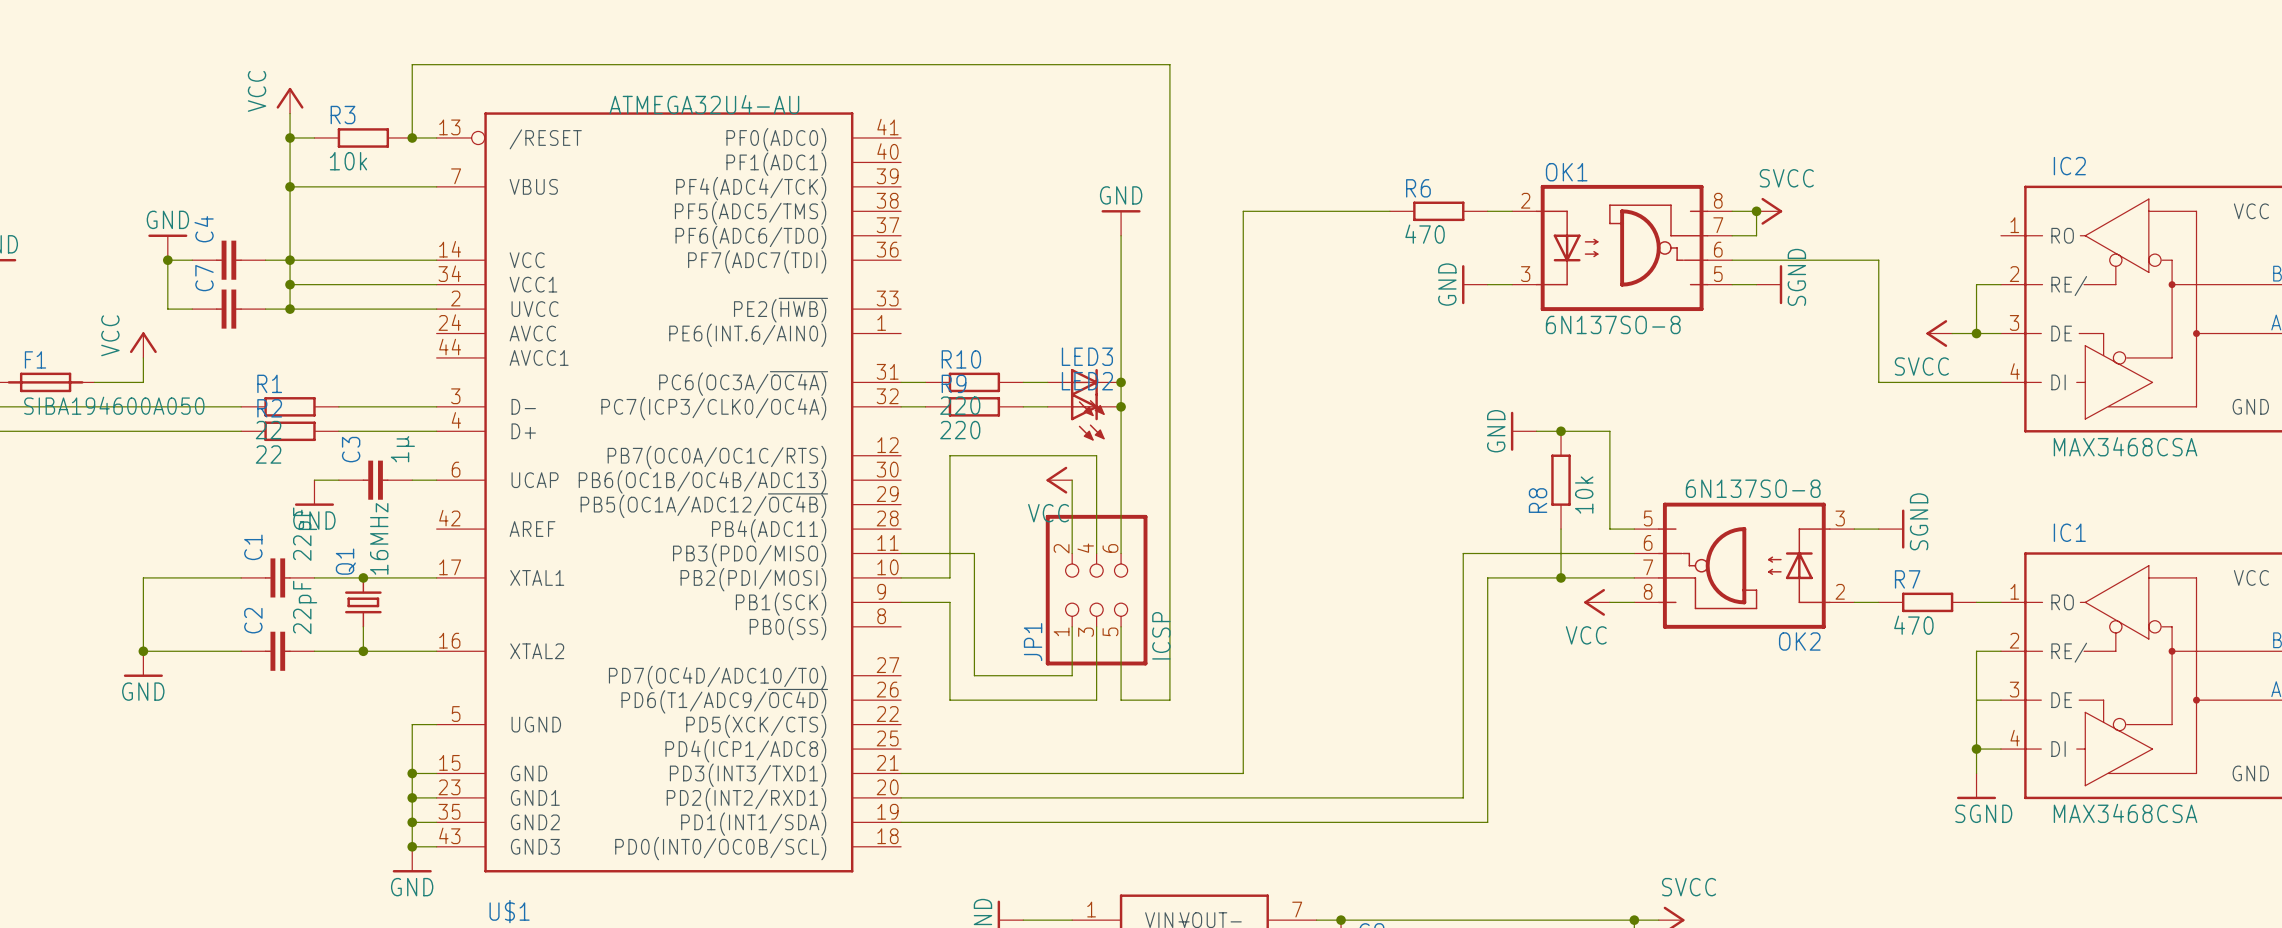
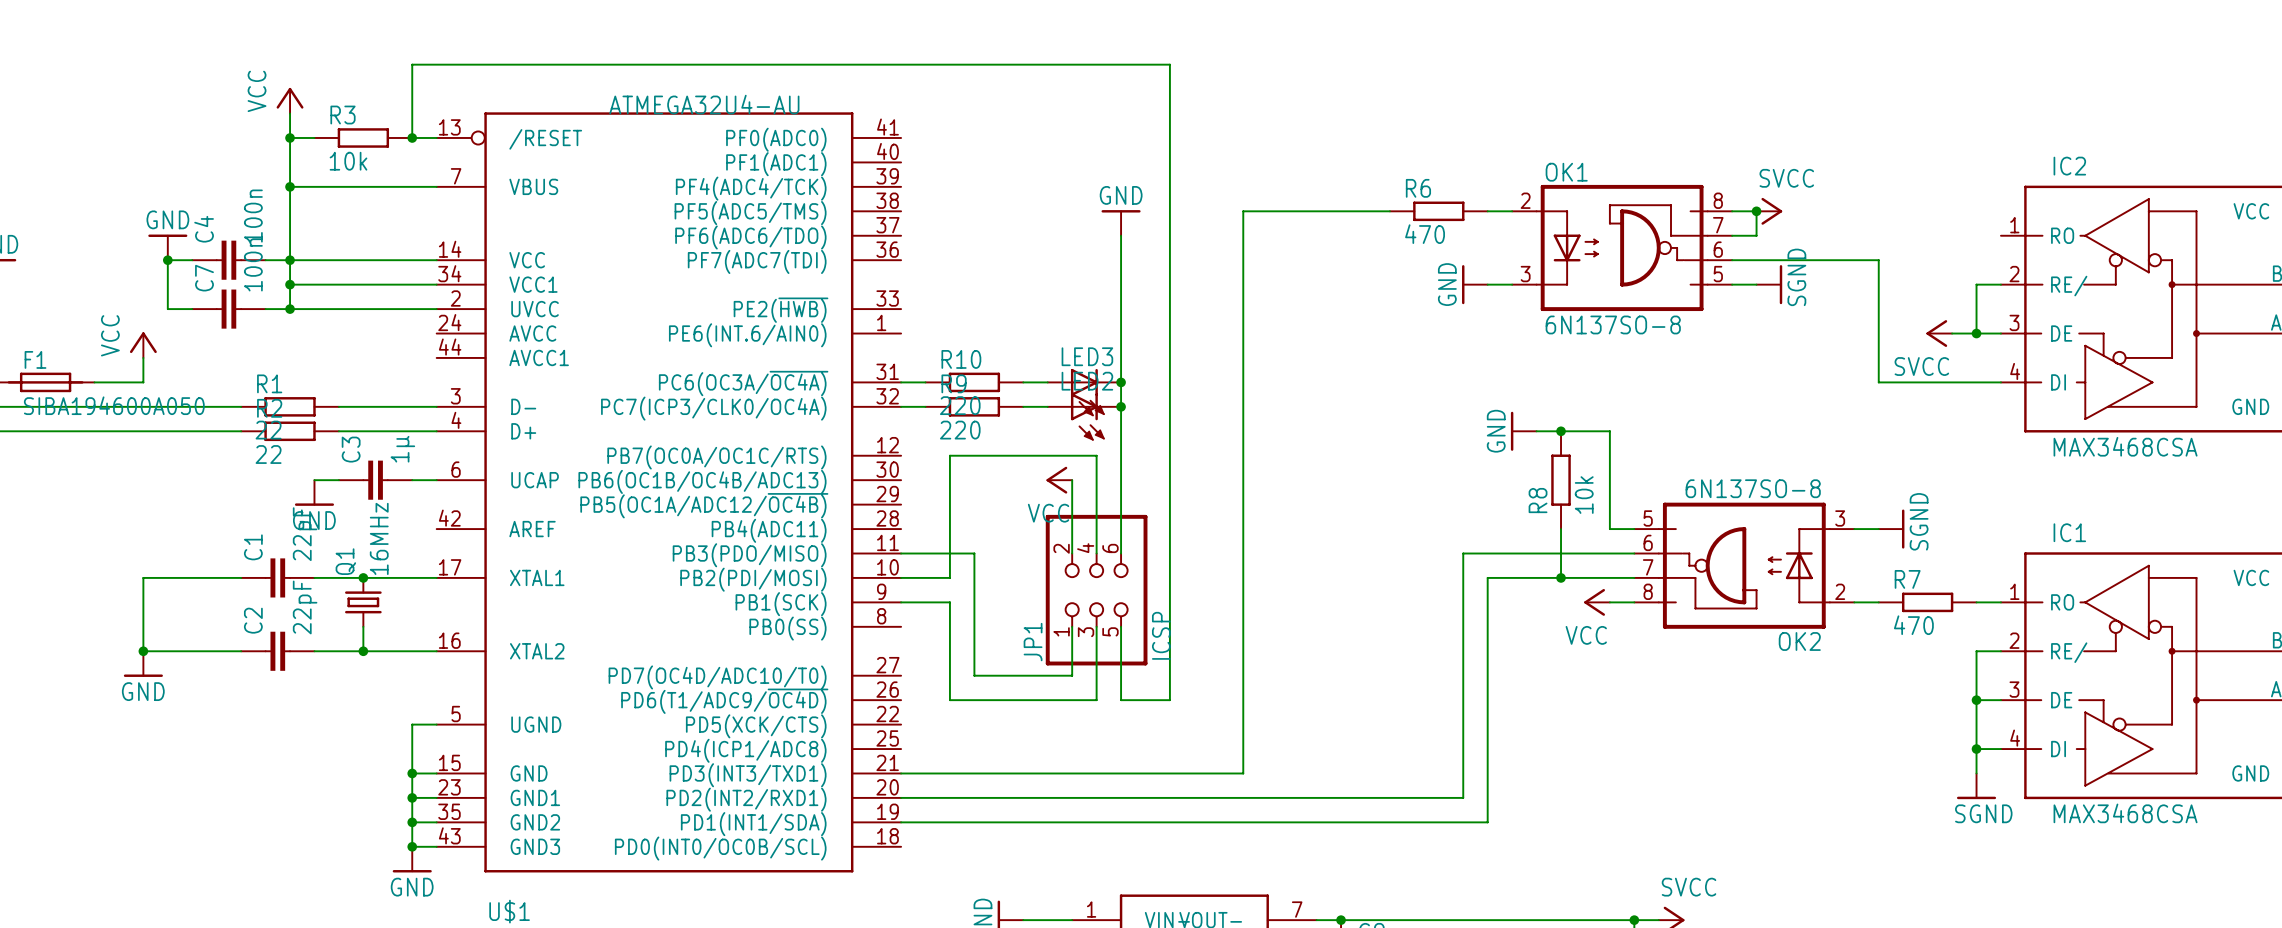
C4 value: none -> 100n (253, 216)
C7 value: none -> 100n (253, 264)
junction: none -> (1976, 700)

